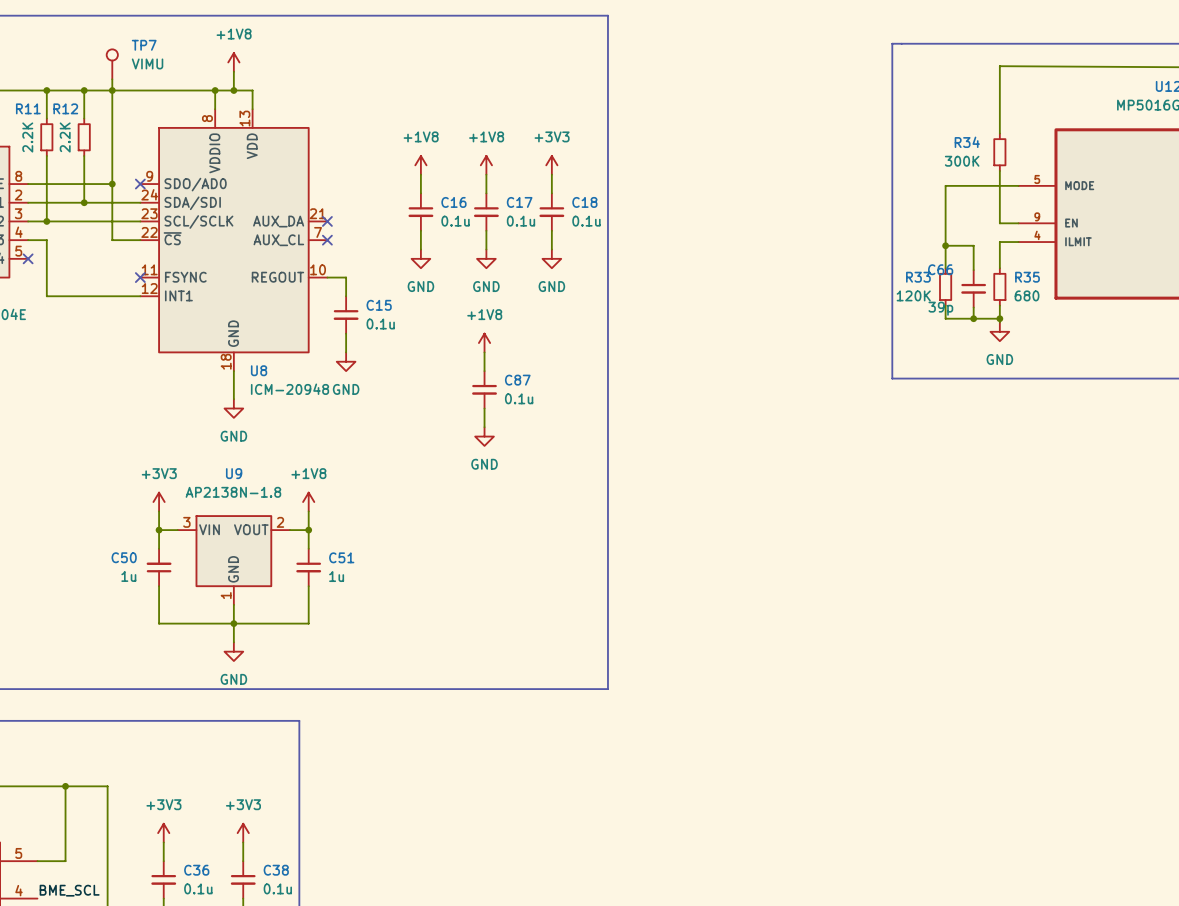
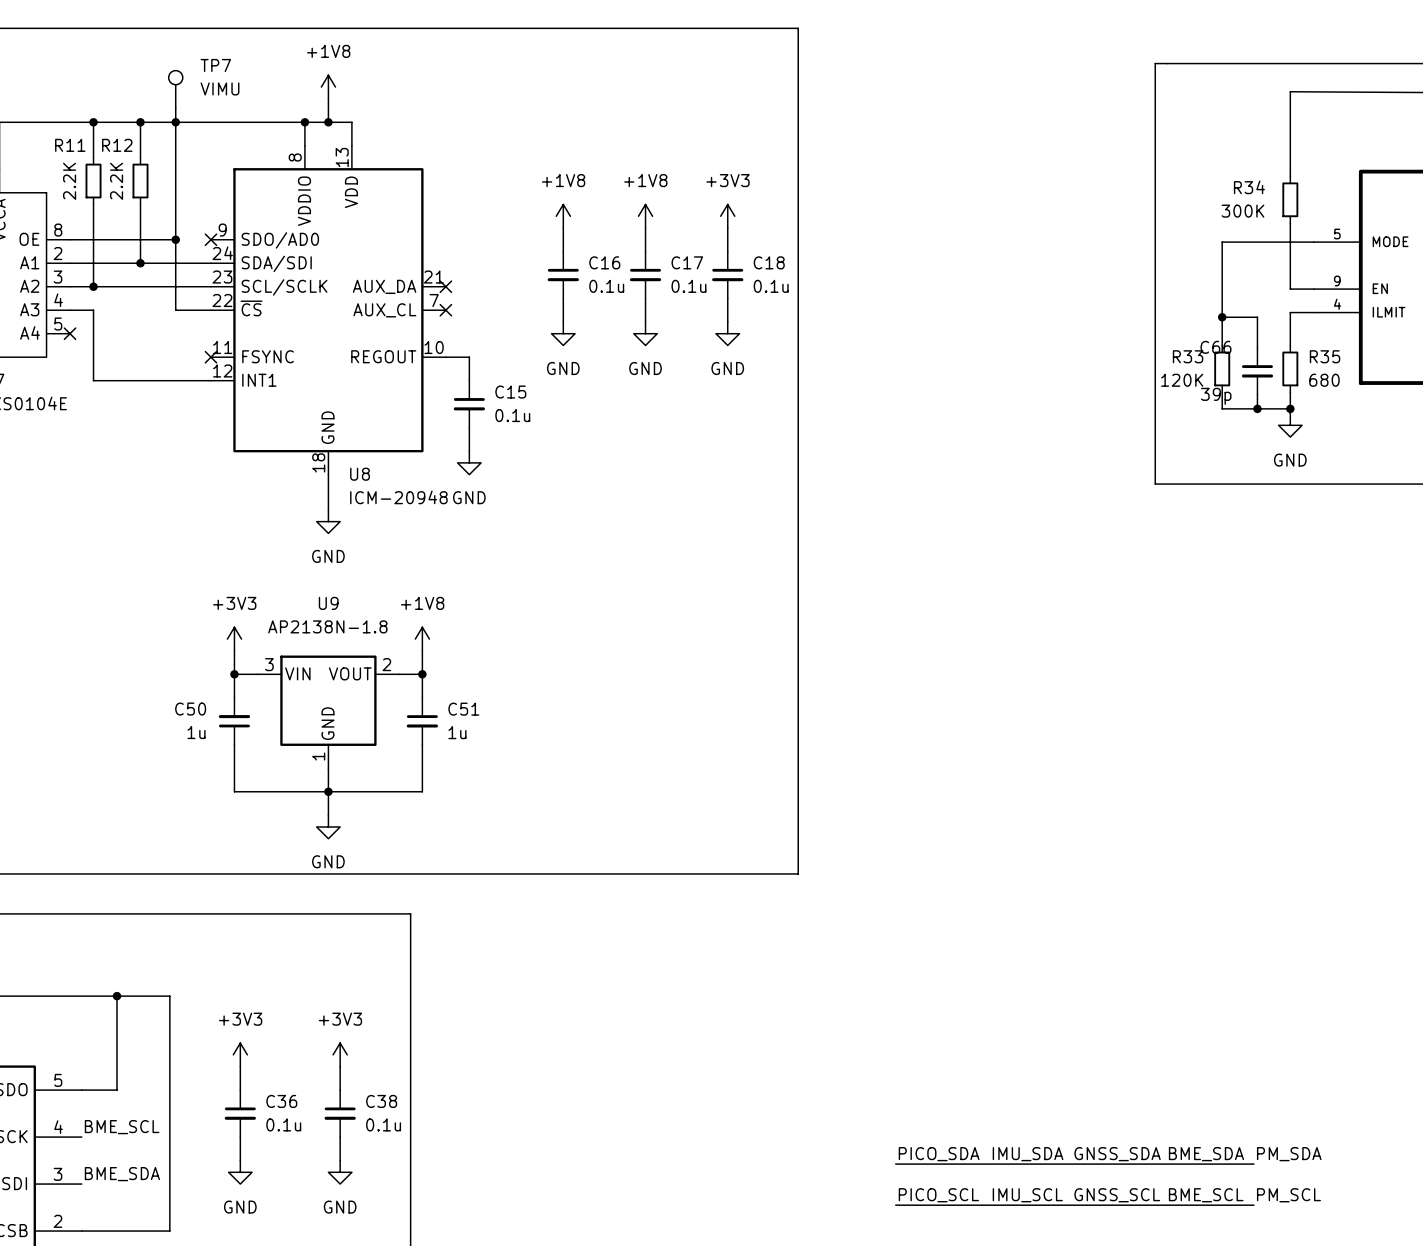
power symbol: +1V8 (484, 343) -> none
wire: (484, 352) (484, 371) -> none
C87: 0.1u (484, 389) -> none
wire: (484, 408) (484, 427) -> none
power symbol: GND (484, 436) -> none

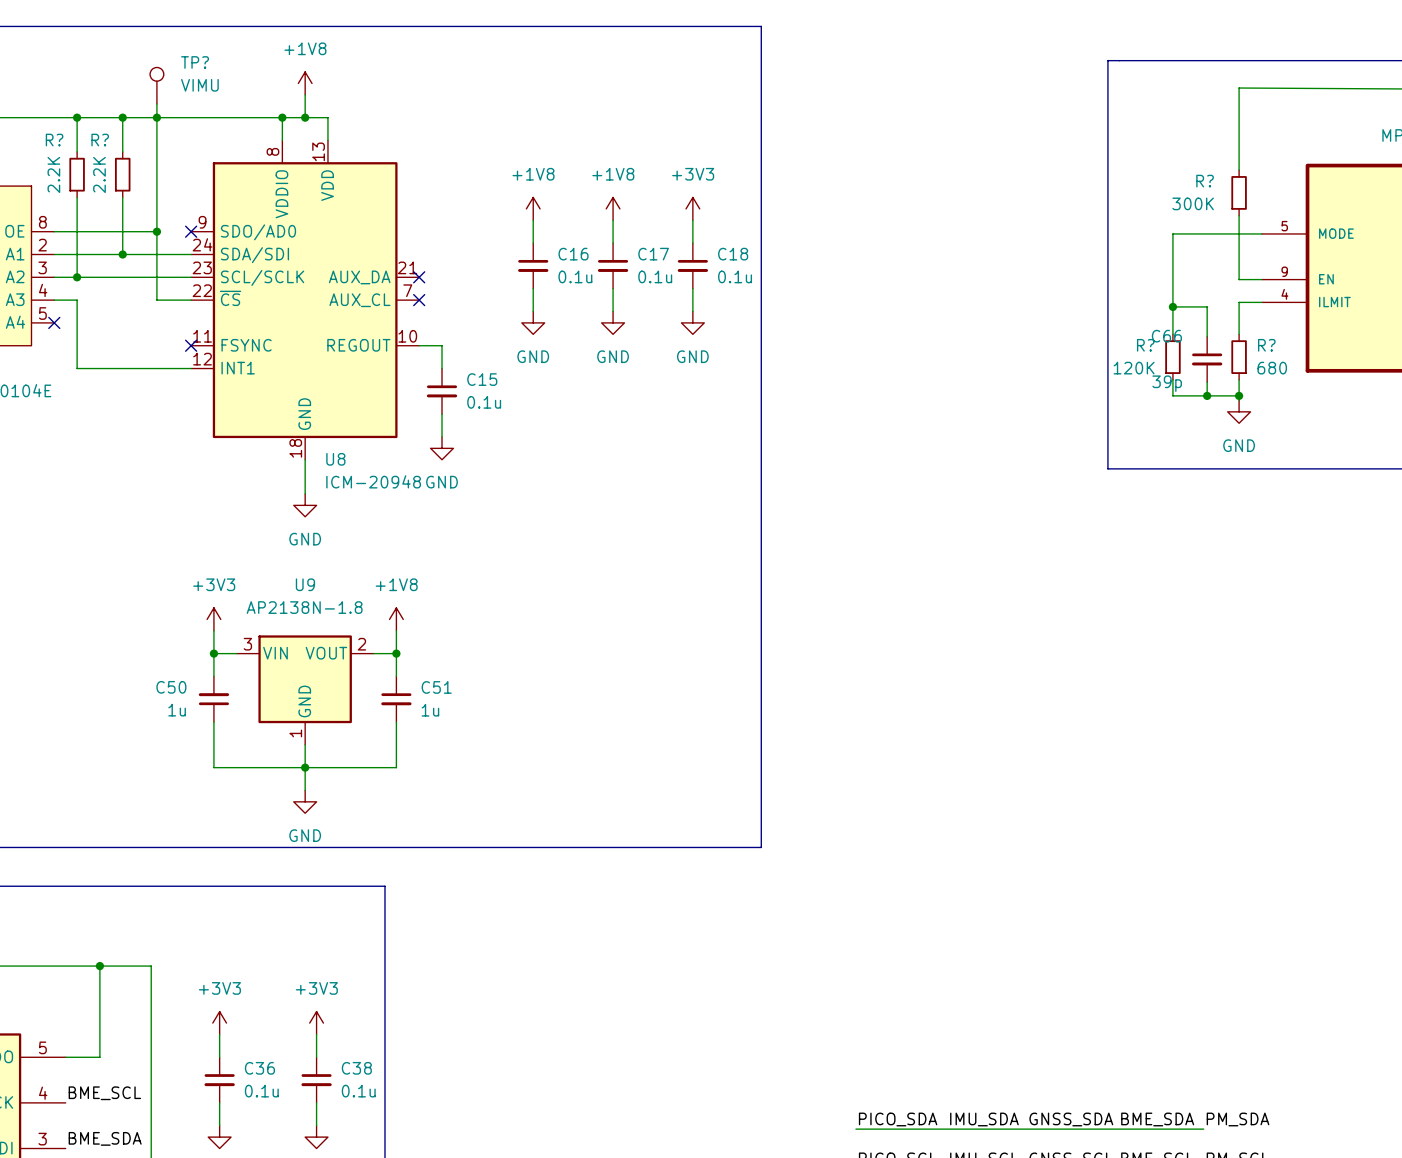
TP7 name: TP7 (215, 65) -> TP? (195, 62)
R11 name: R11 (70, 145) -> R? (54, 140)
R12 name: R12 (117, 145) -> R? (100, 140)
R34 name: R34 (1249, 187) -> R? (1205, 181)
R33 name: R33 (1188, 356) -> R? (1145, 345)
R35 name: R35 (1325, 356) -> R? (1266, 345)

